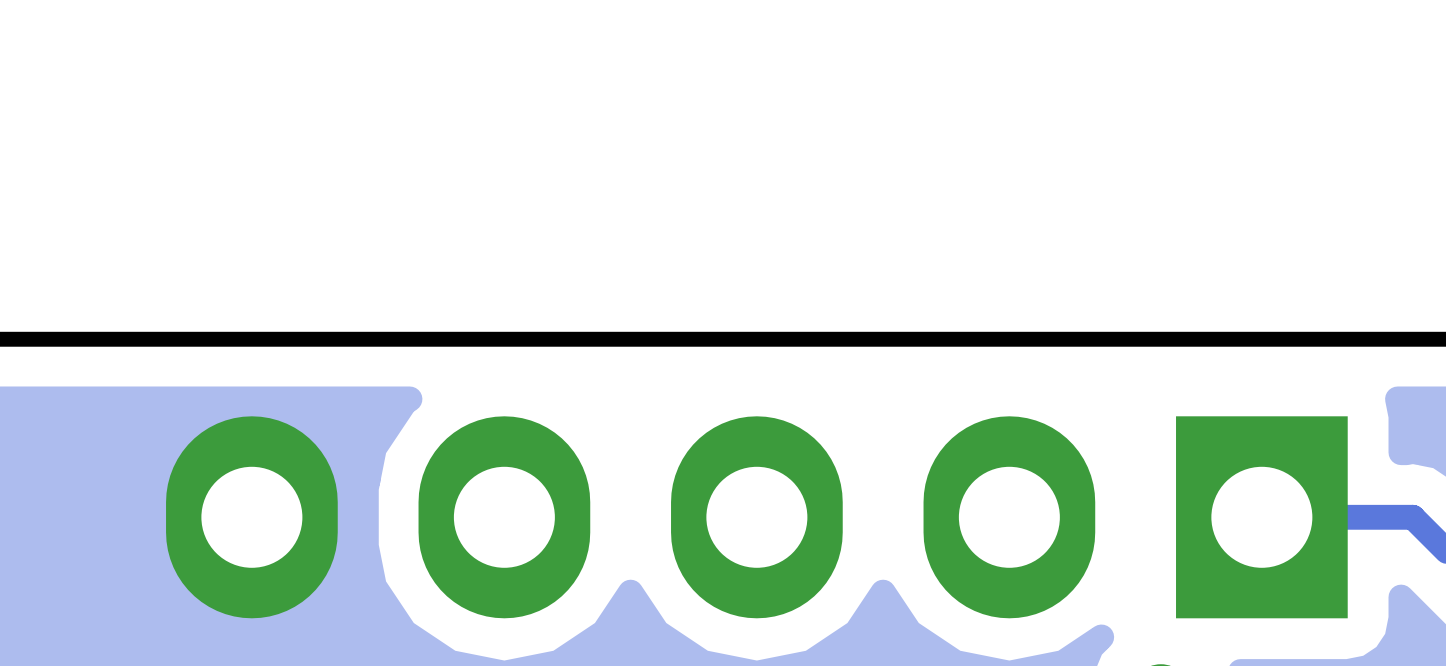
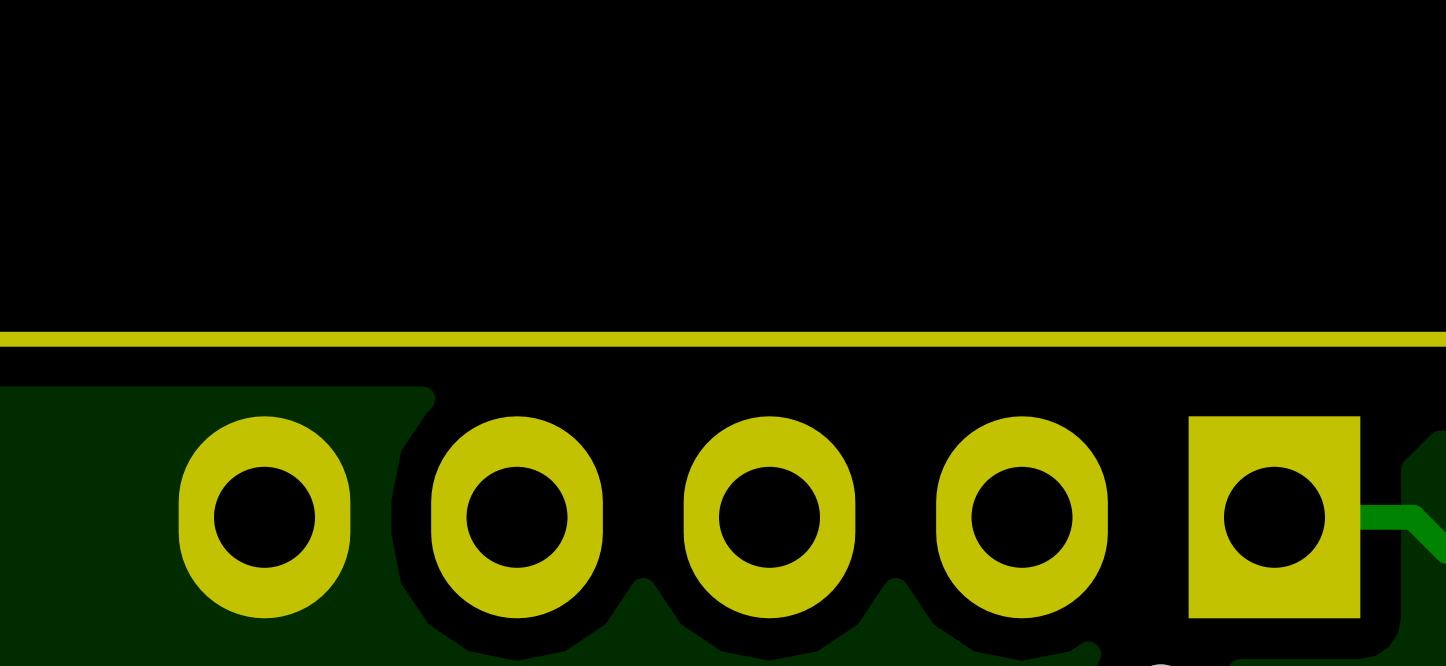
part position: (756, 517) -> (769, 517)

